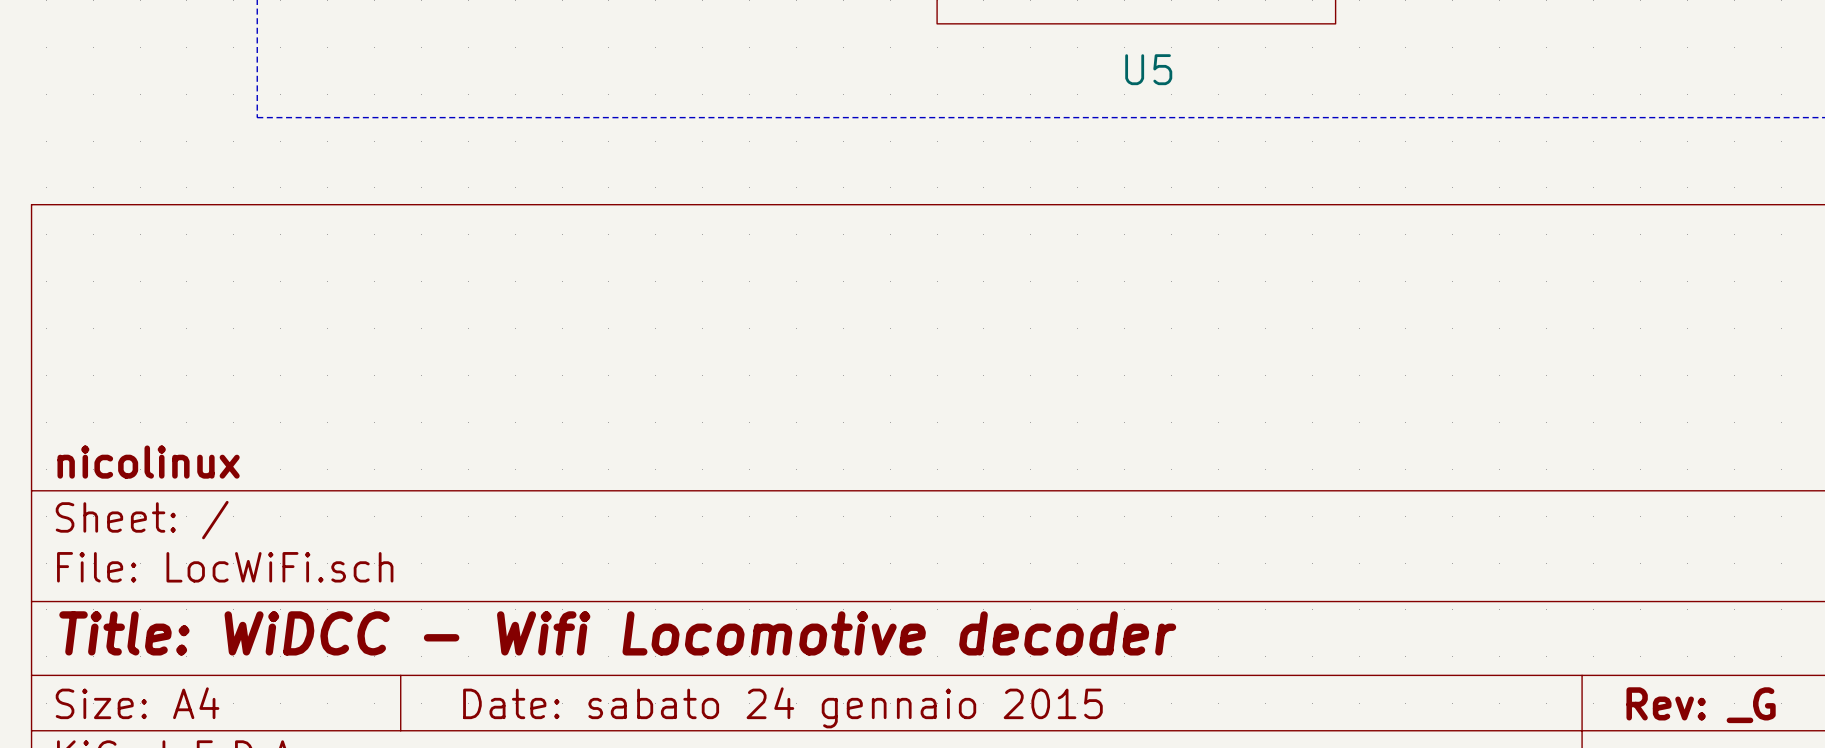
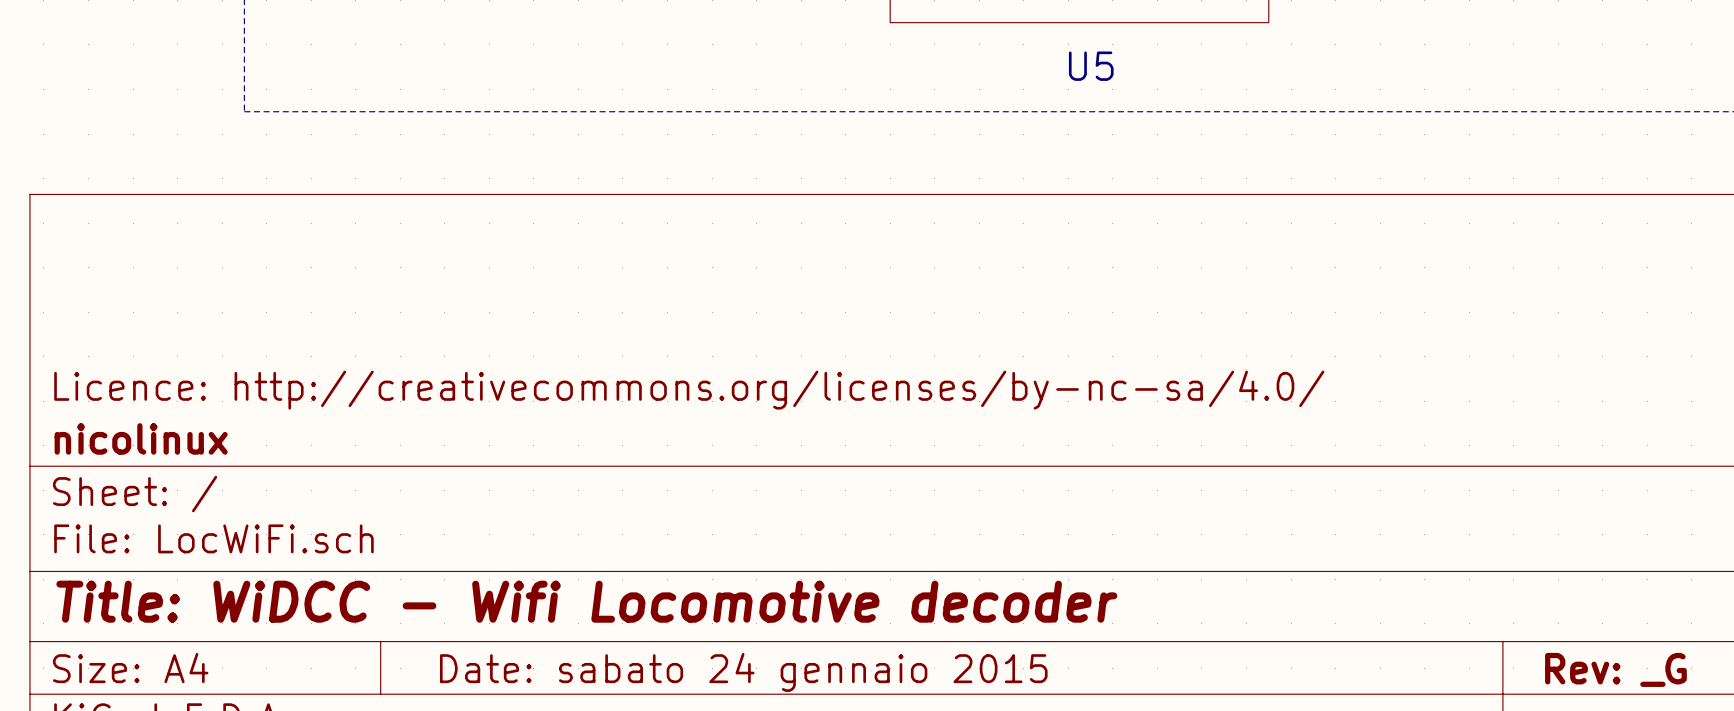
title block: none -> Licence: http://creativecommons.org/licenses/by-nc-sa/4.0/ (689, 390)

